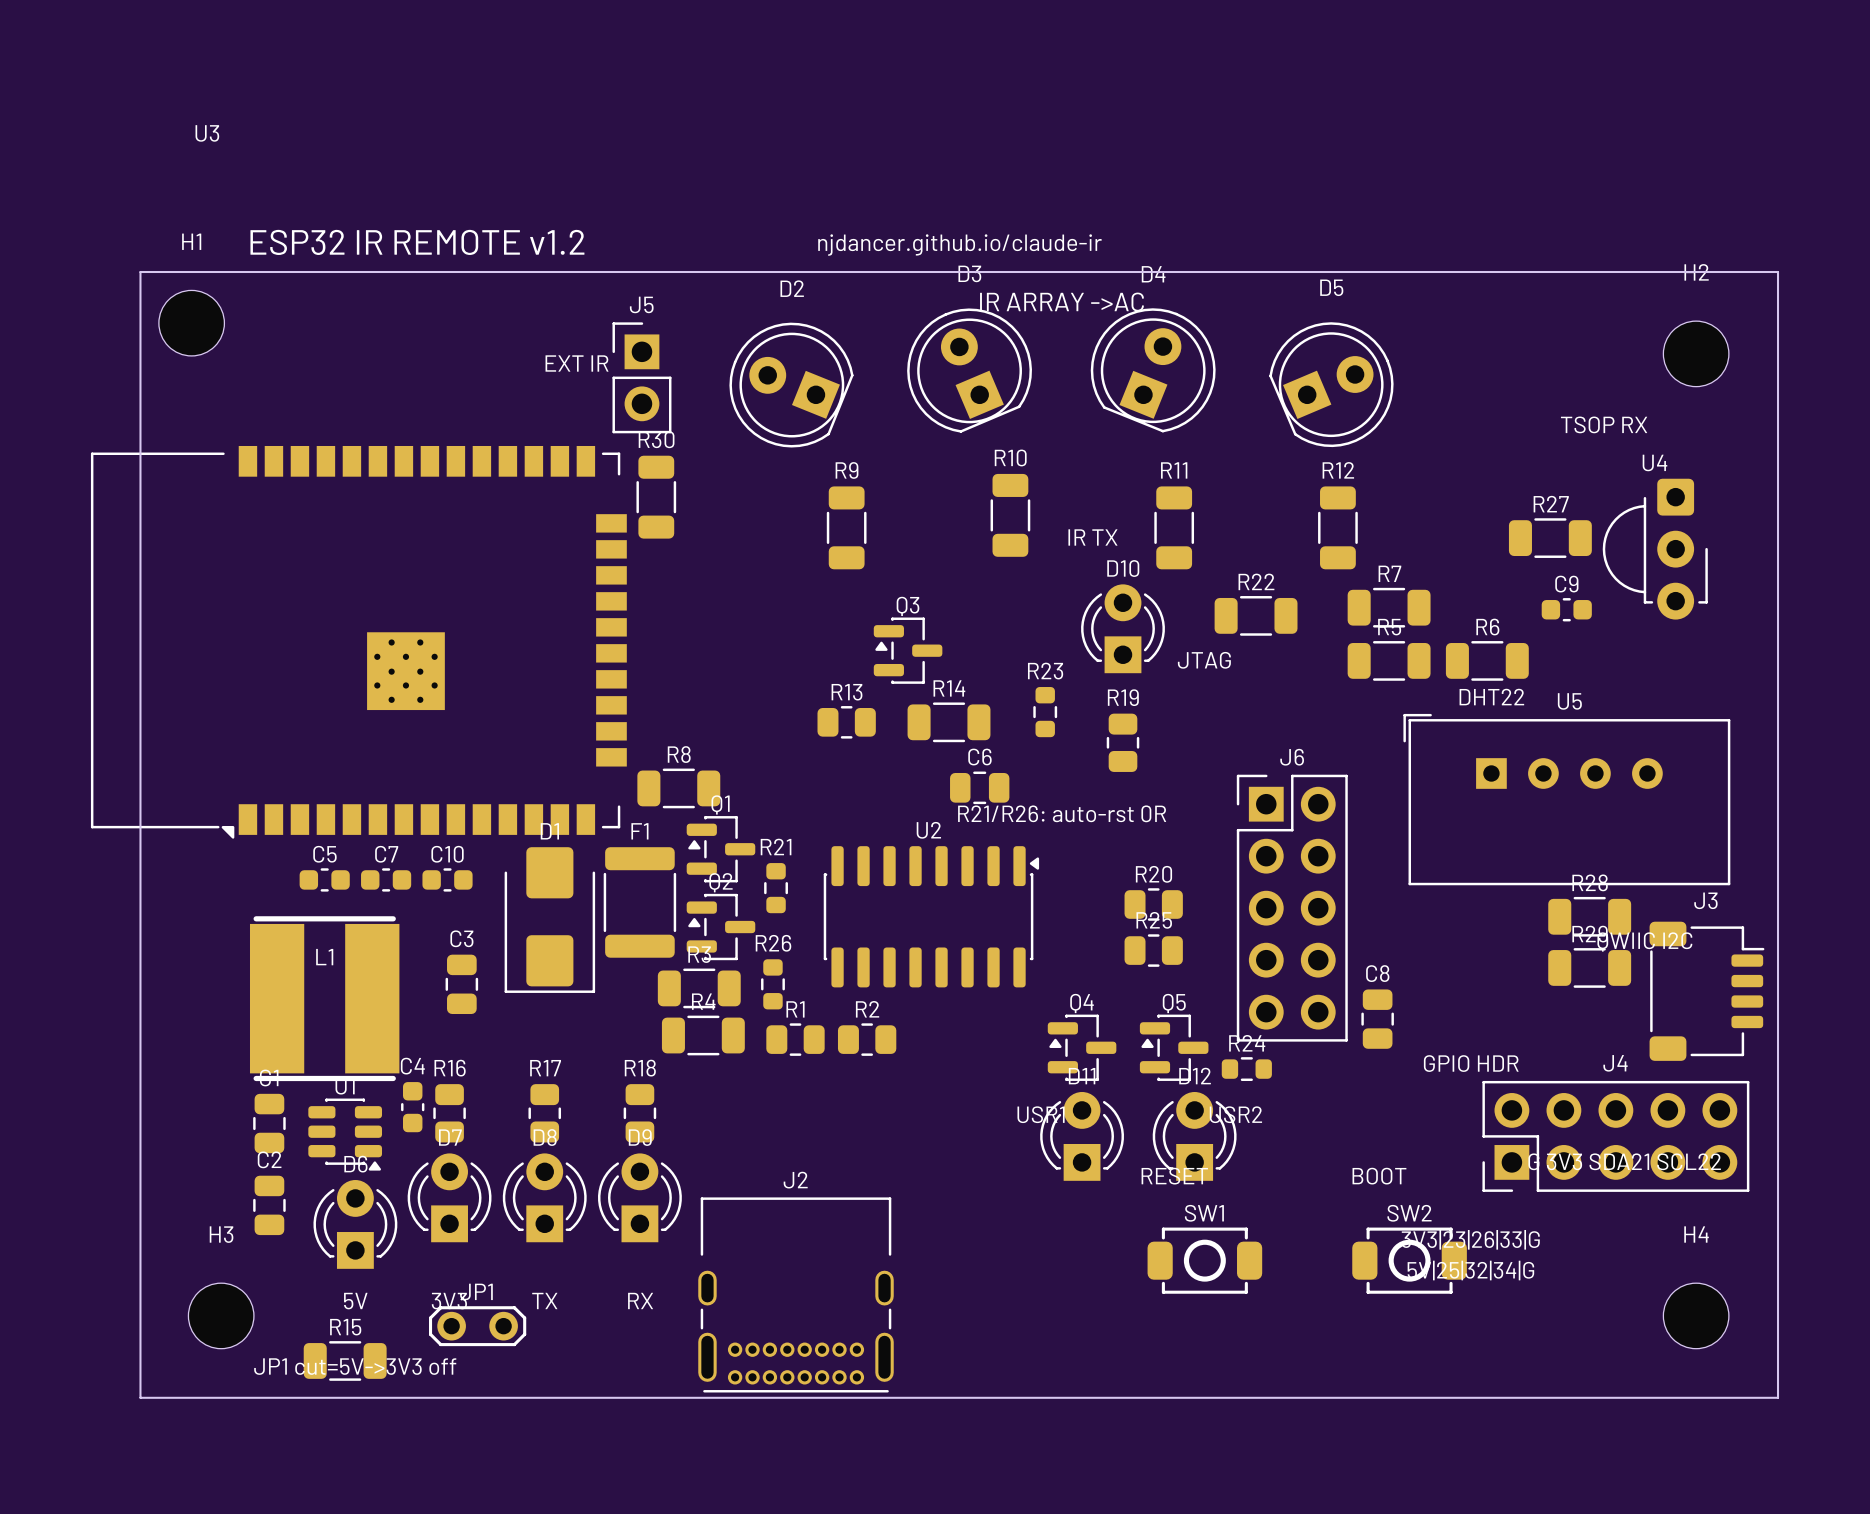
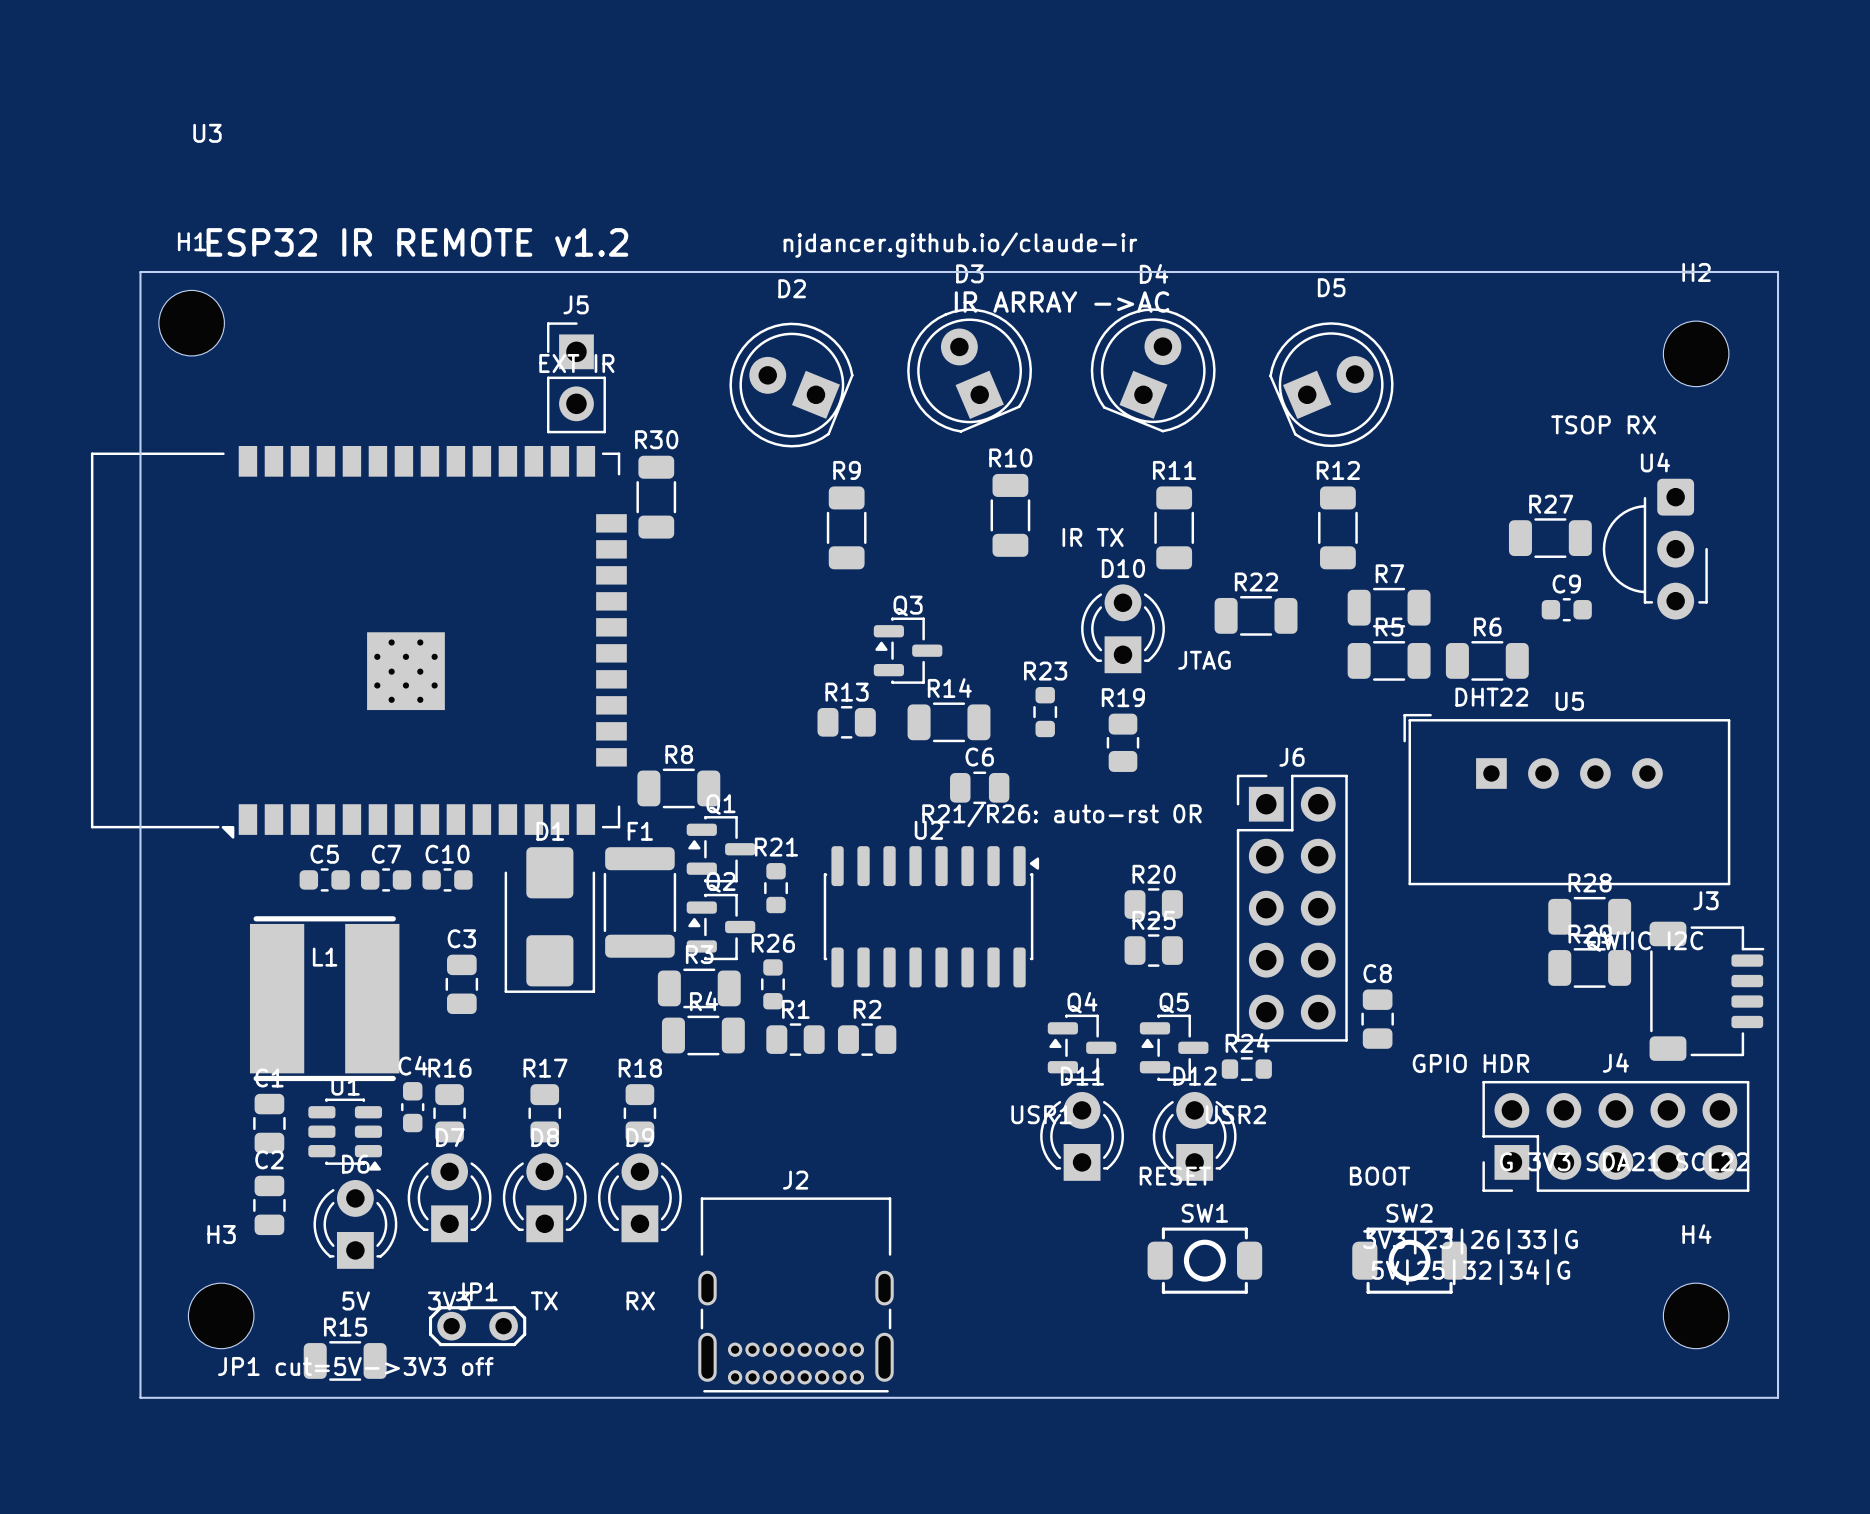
J5 position: (641, 377) -> (576, 377)

